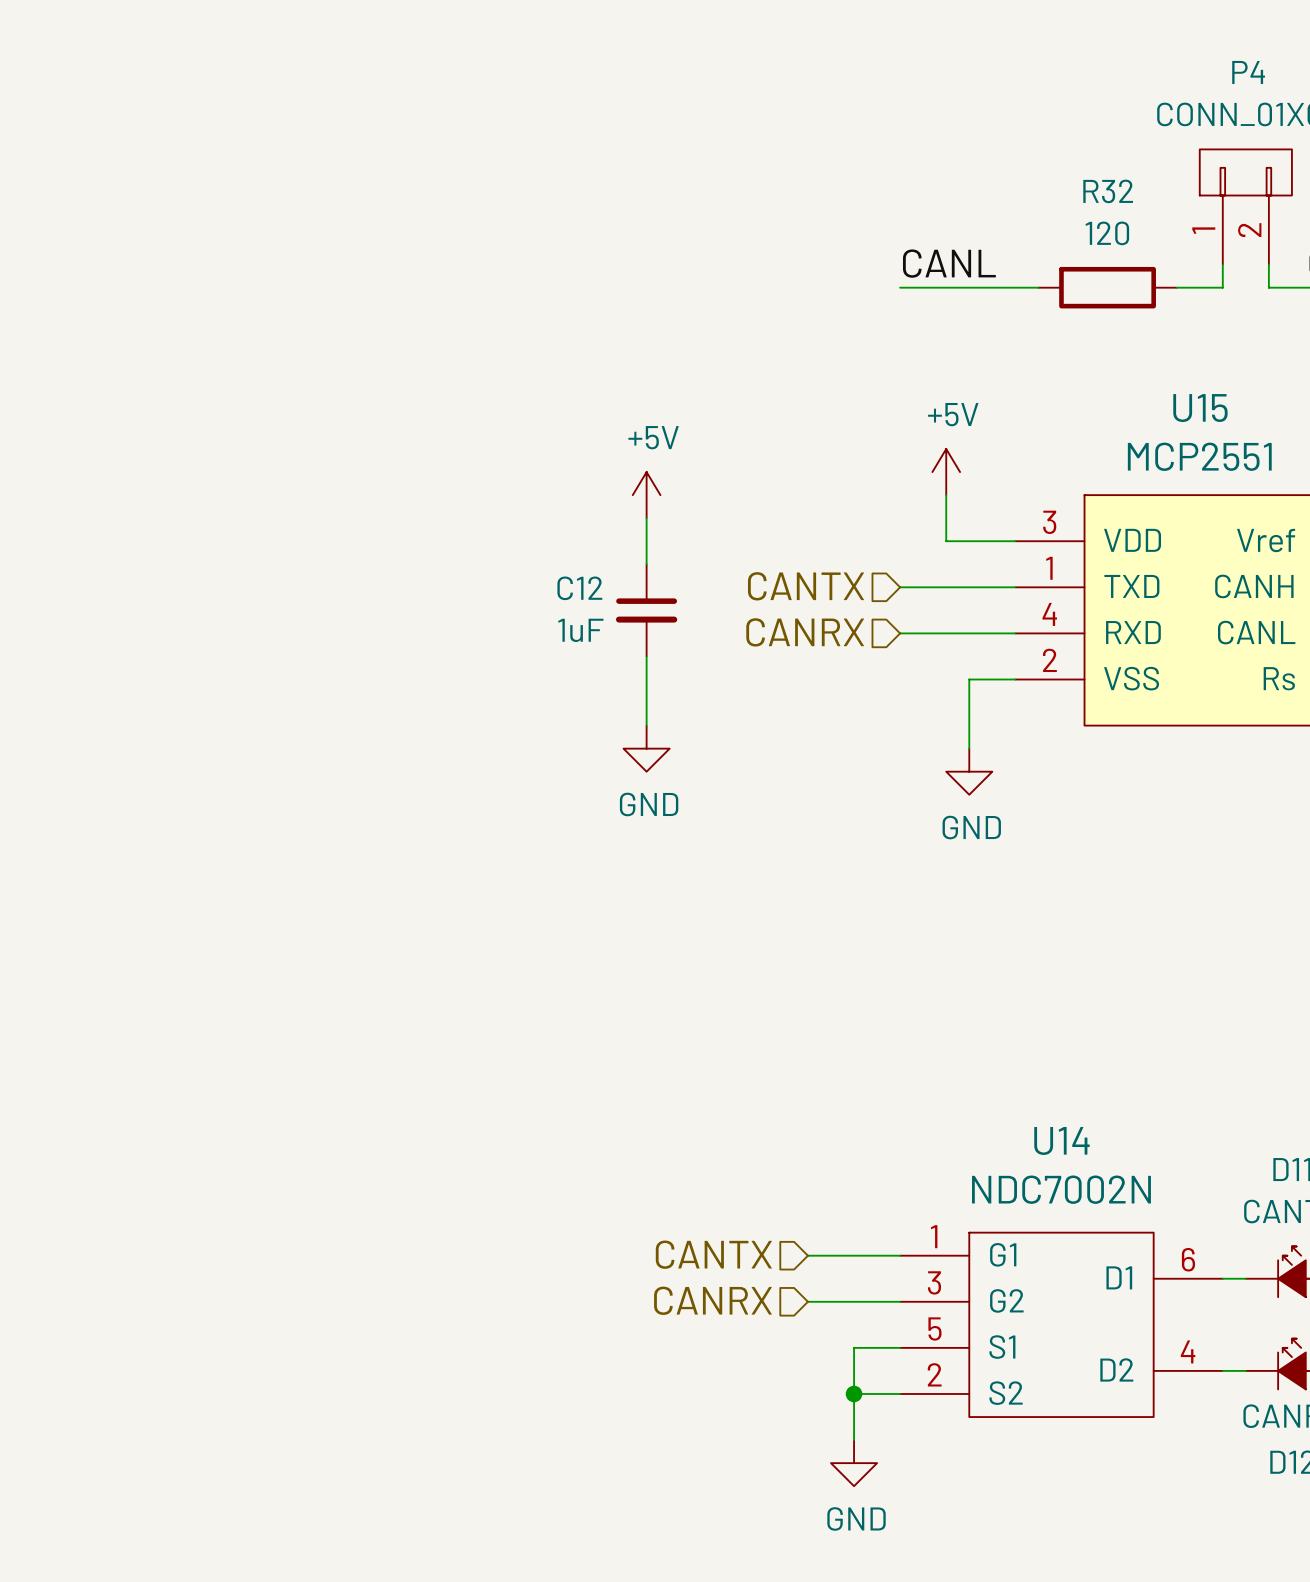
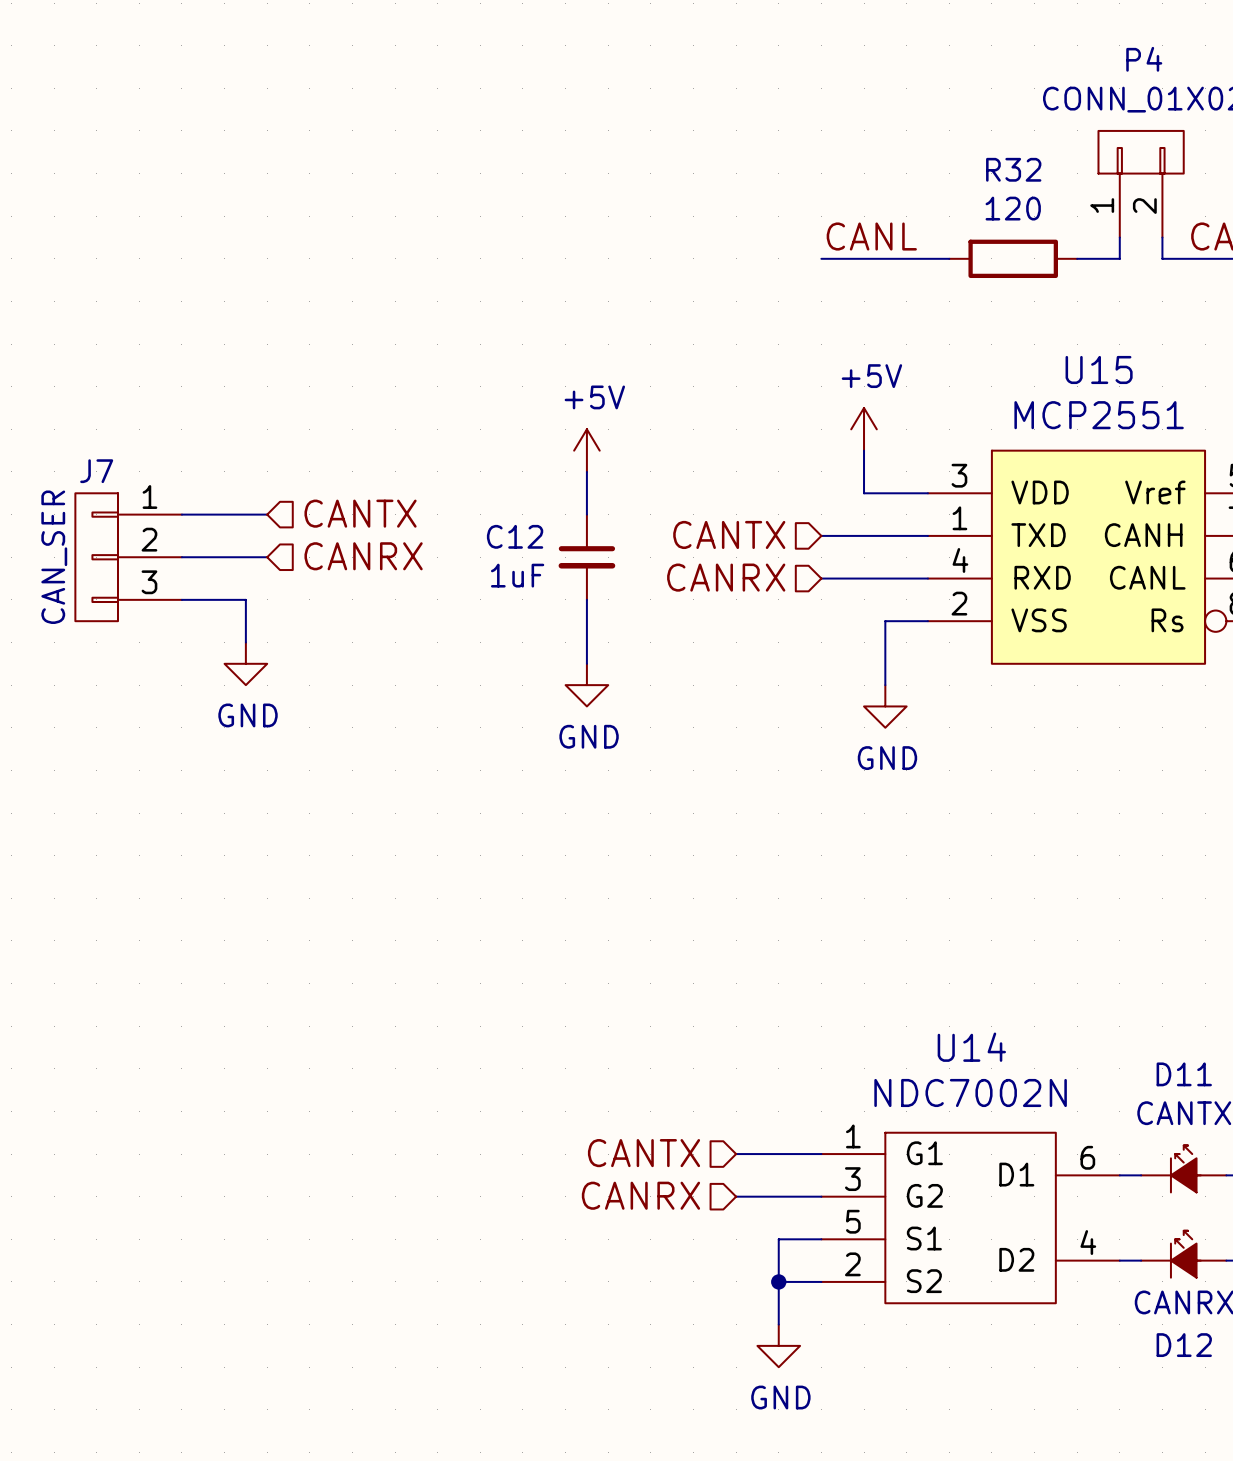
hierarchical label: none -> CANTX (360, 513)
wire: none -> (181, 514) (267, 514)
hierarchical label: none -> CANRX (363, 556)
J7: none -> CAN_SER (128, 557)
wire: none -> (181, 557) (267, 557)
wire: none -> (181, 599) (245, 599) (245, 642)
power symbol: none -> GND (245, 663)

